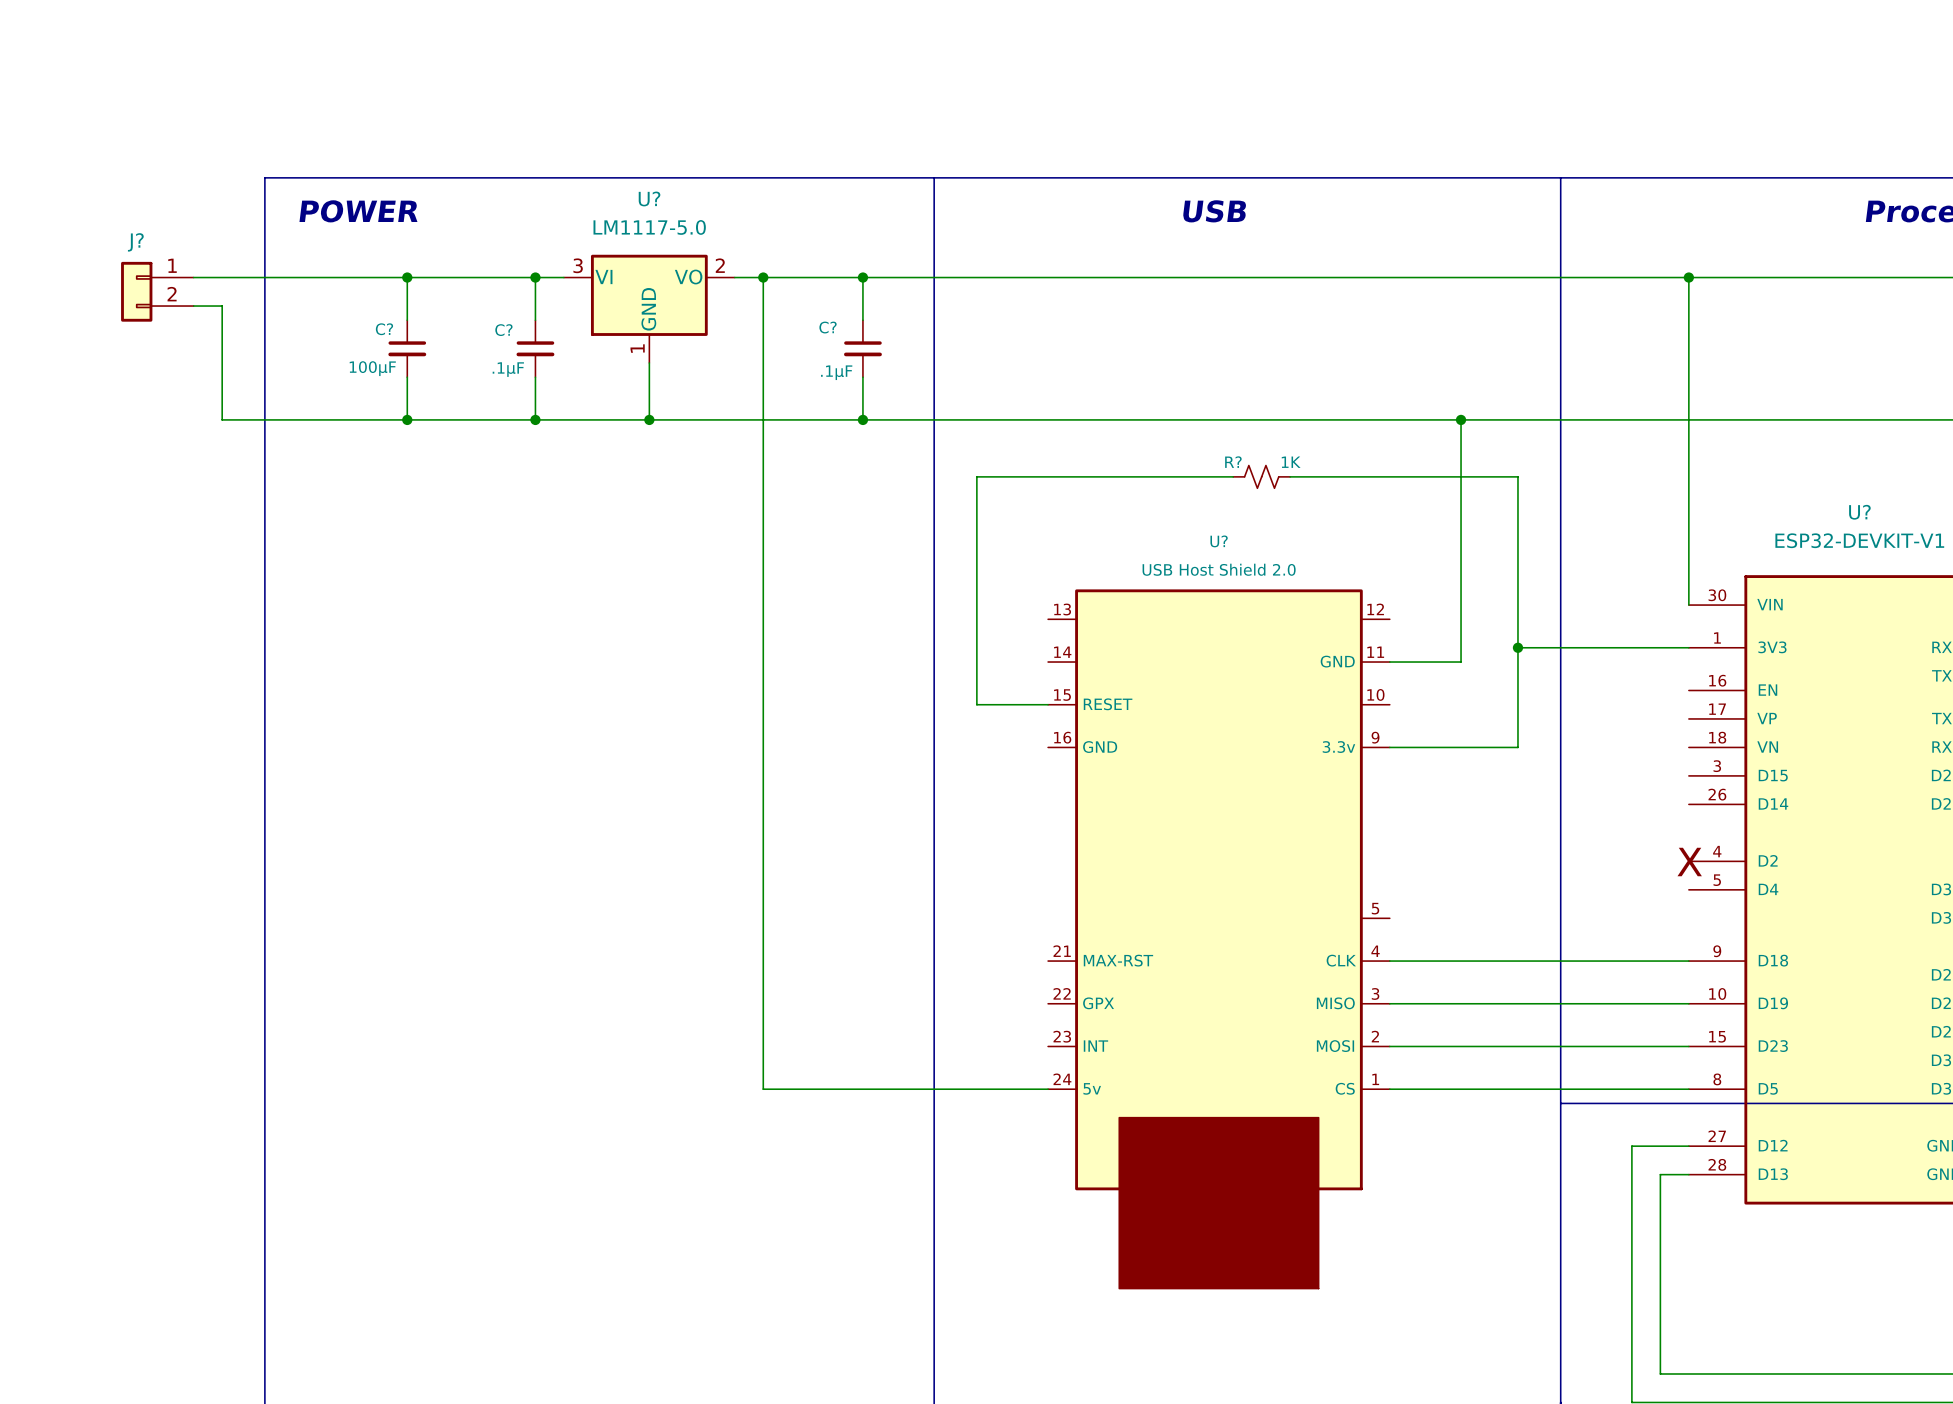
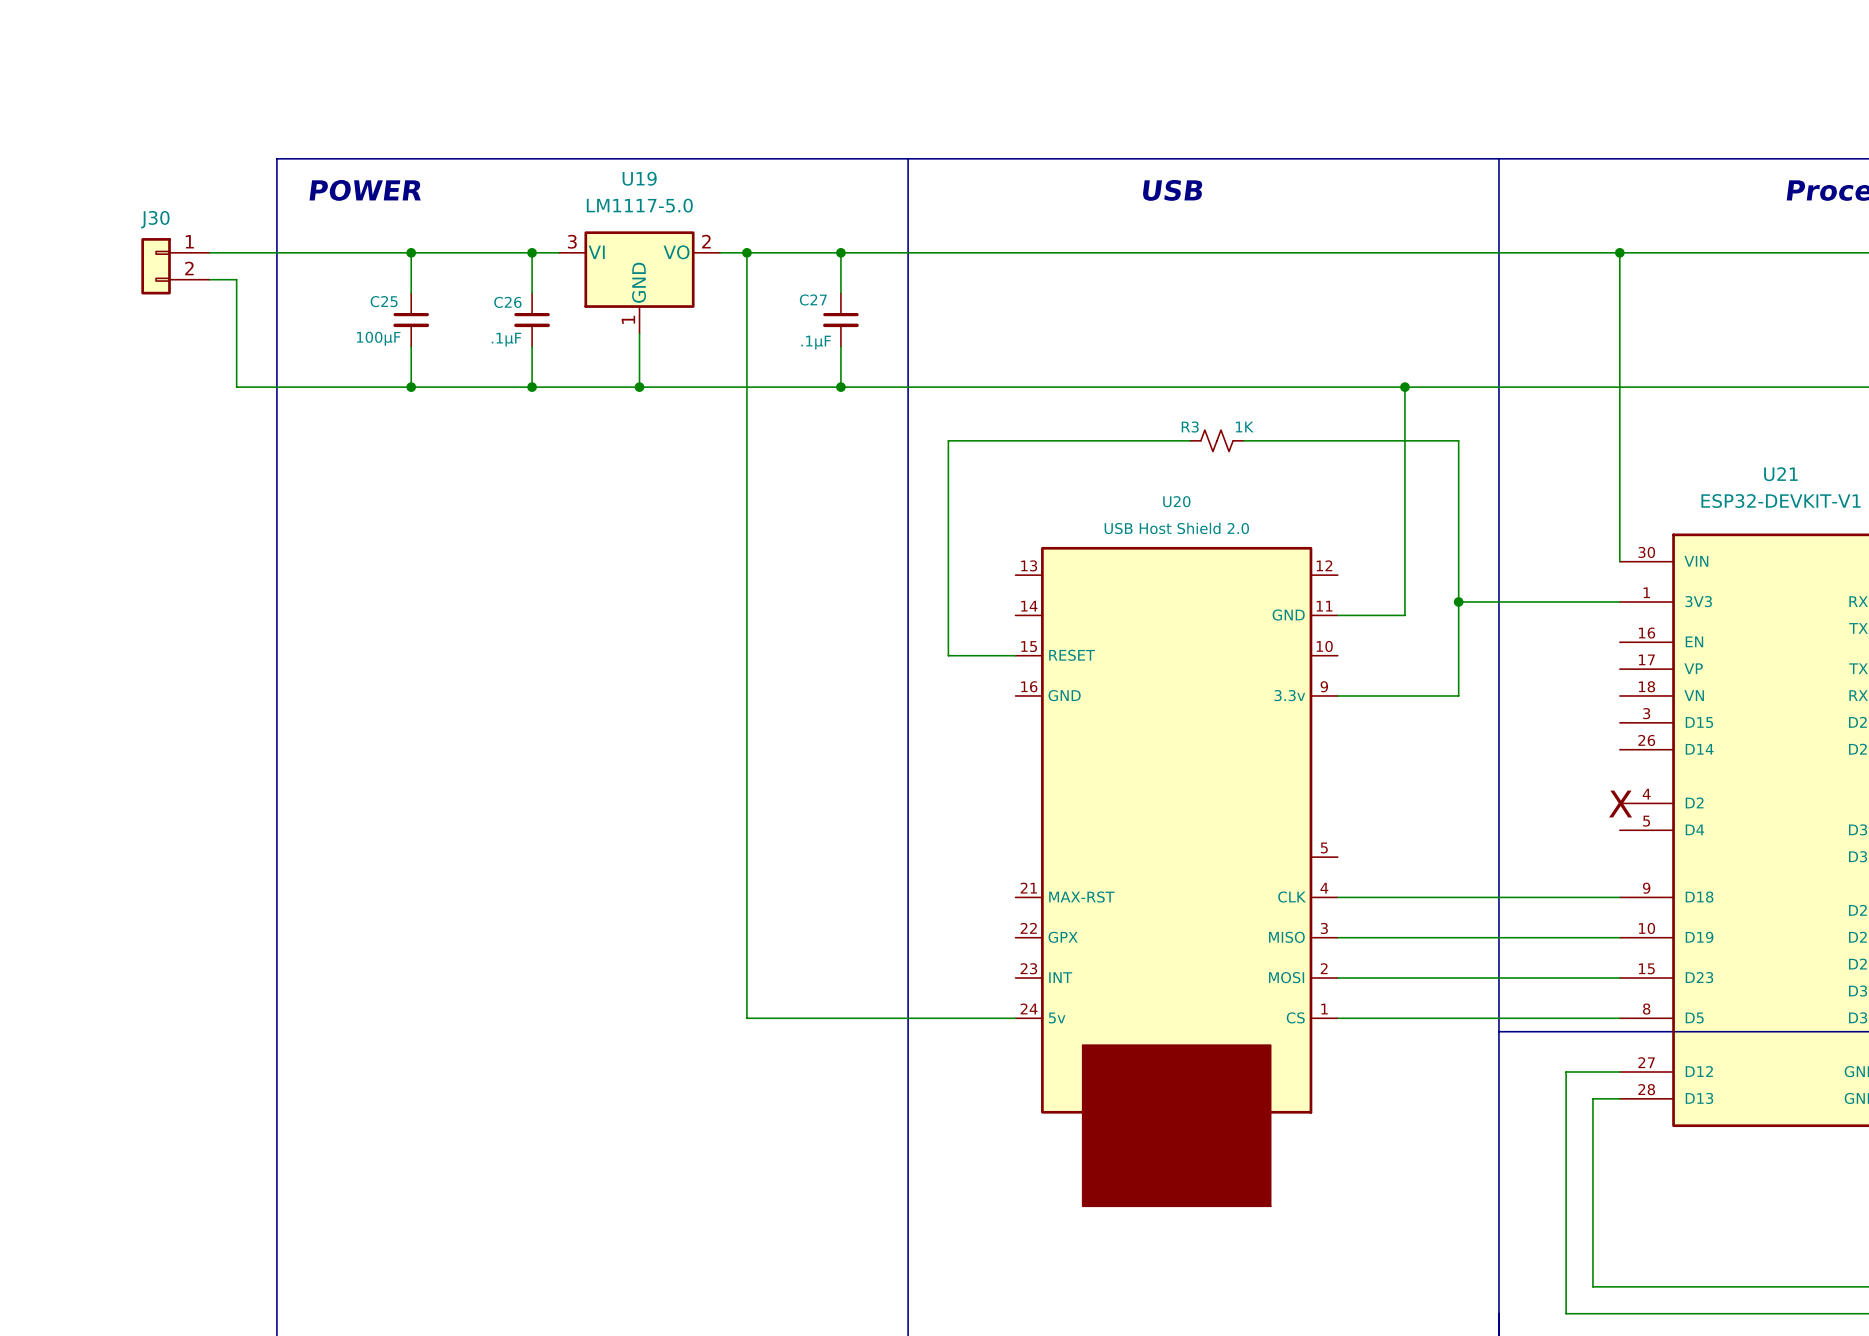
U? name: U? (649, 198) -> U19 (639, 178)
J? name: J? (135, 242) -> J30 (155, 219)
C? name: C? (828, 327) -> C27 (813, 299)
C? name: C? (384, 329) -> C25 (384, 301)
C? name: C? (503, 330) -> C26 (507, 302)
R? name: R? (1233, 462) -> R3 (1190, 427)
U? name: U? (1859, 512) -> U21 (1780, 474)
U? name: U? (1219, 541) -> U20 (1176, 501)

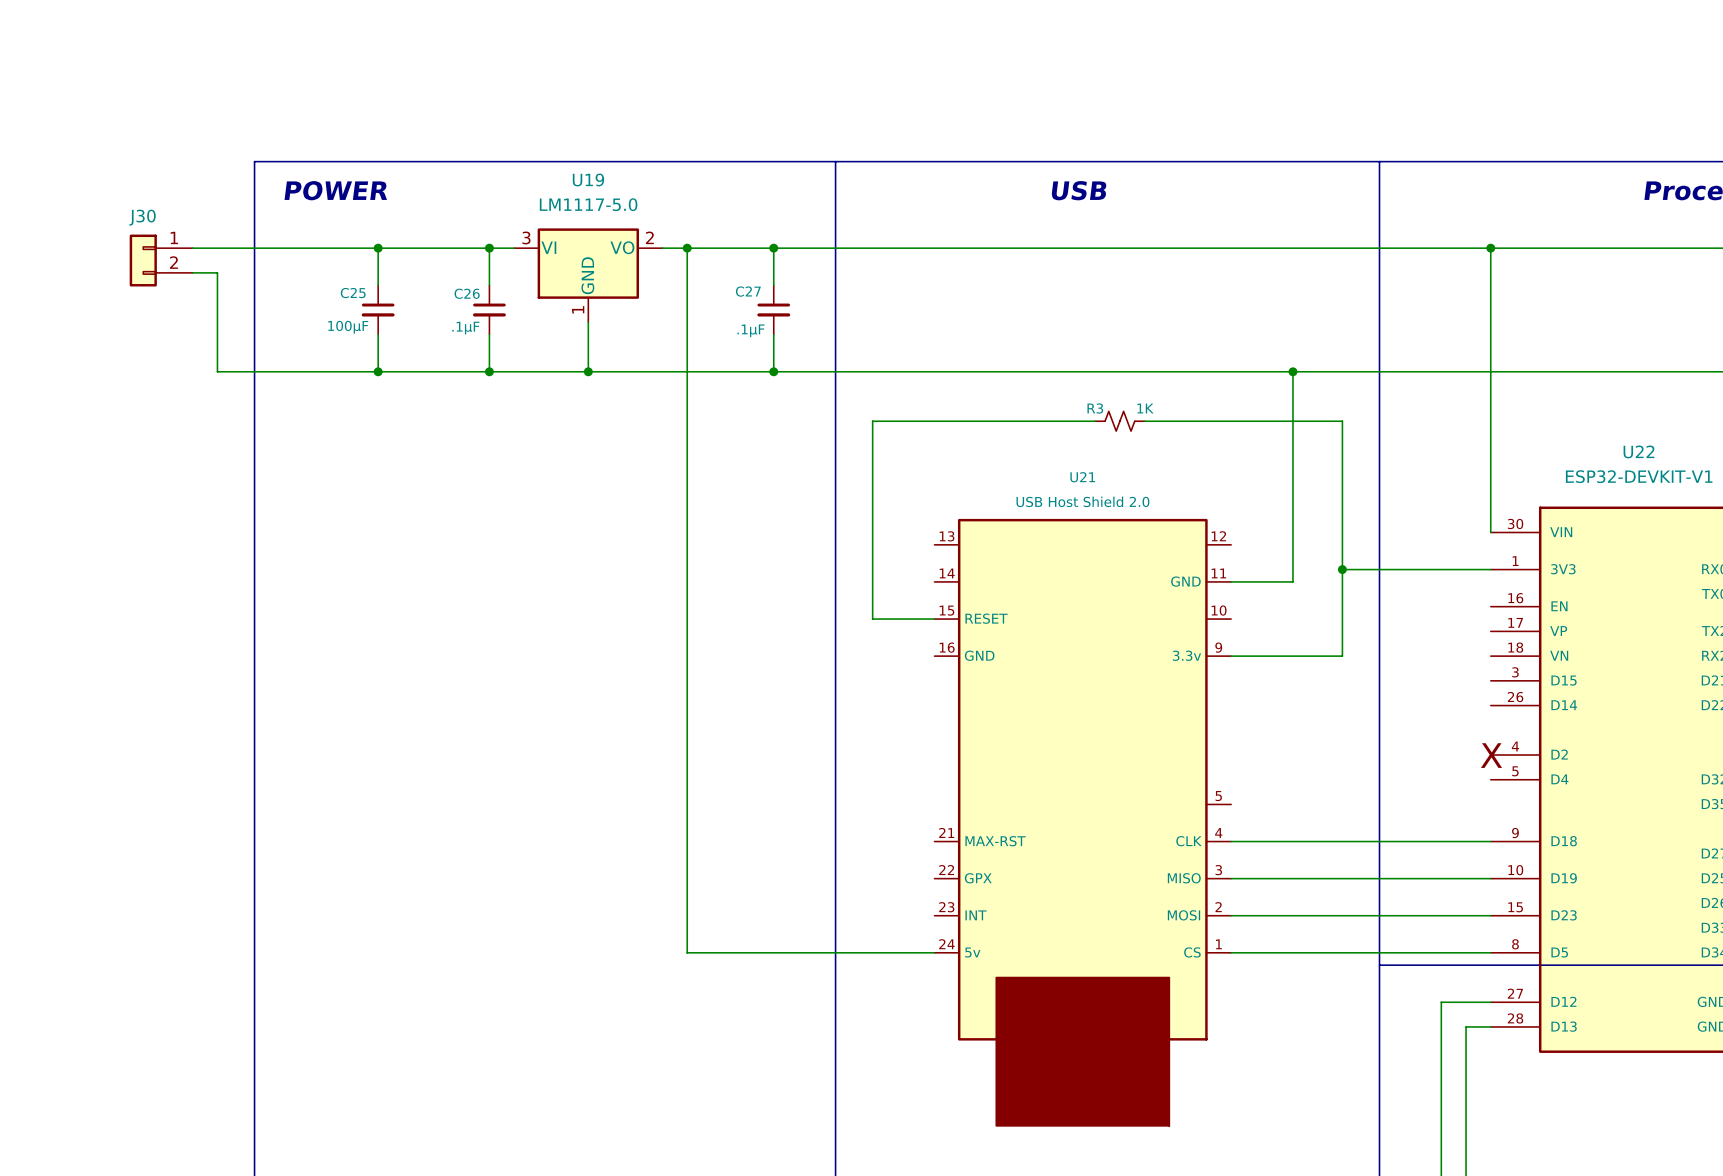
U21 name: U21 (1780, 474) -> U22 (1639, 451)
U20 name: U20 (1176, 501) -> U21 (1082, 477)

